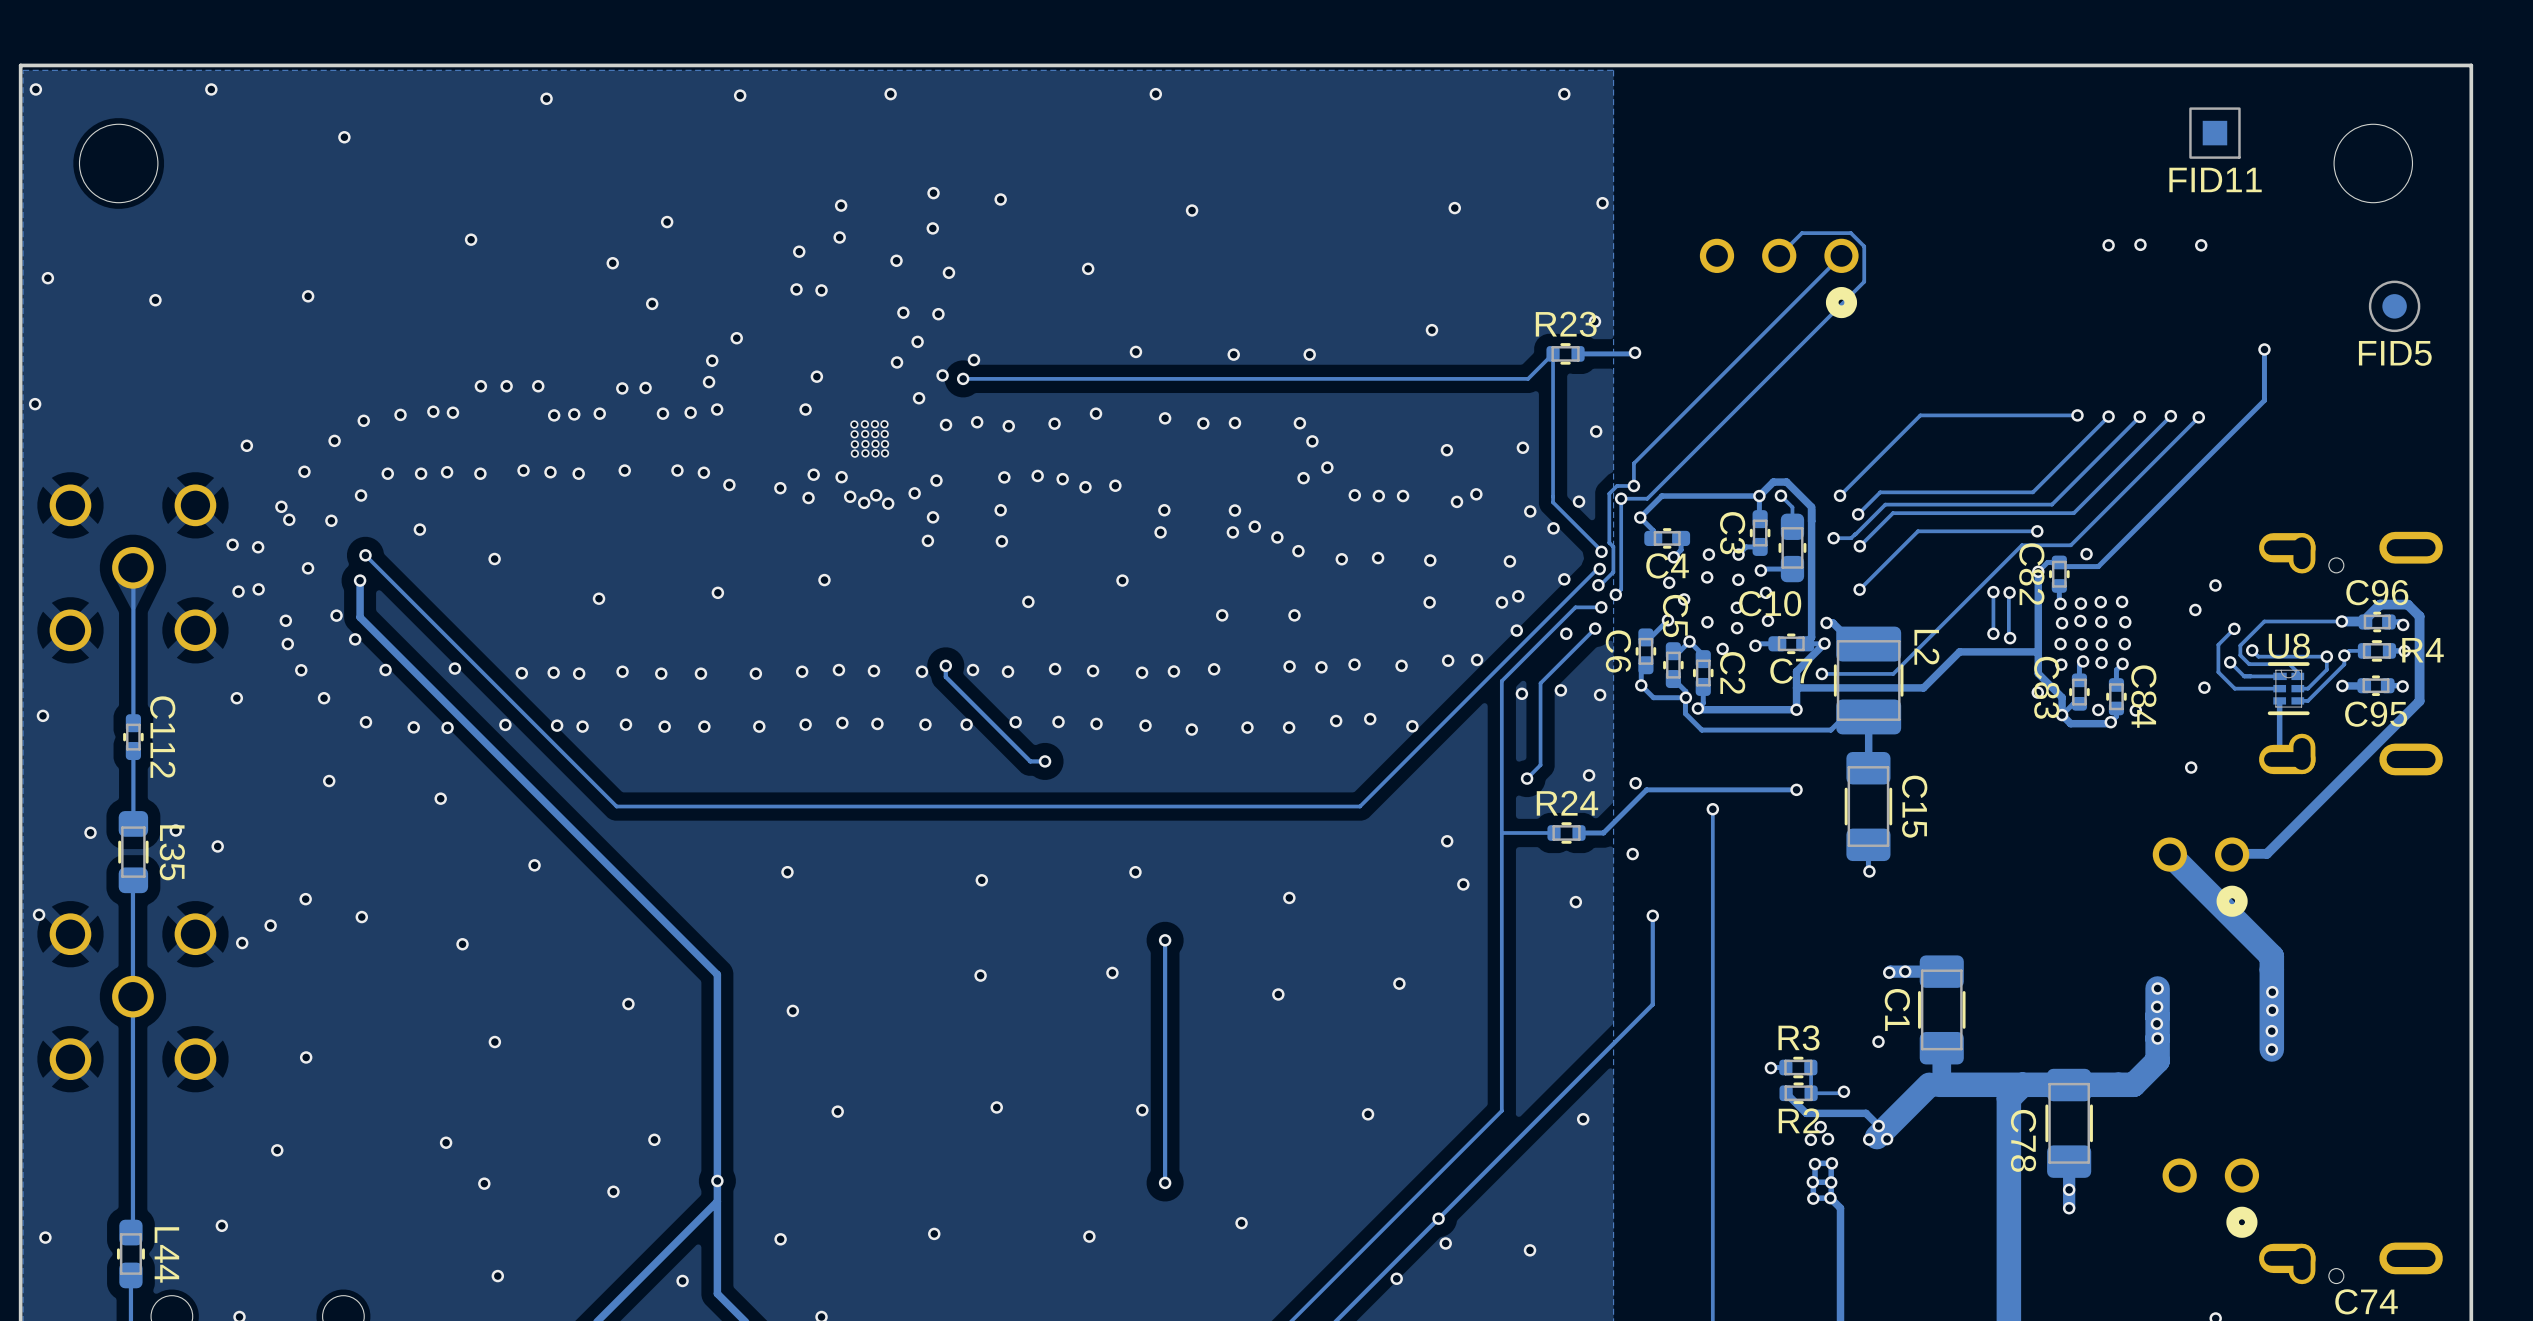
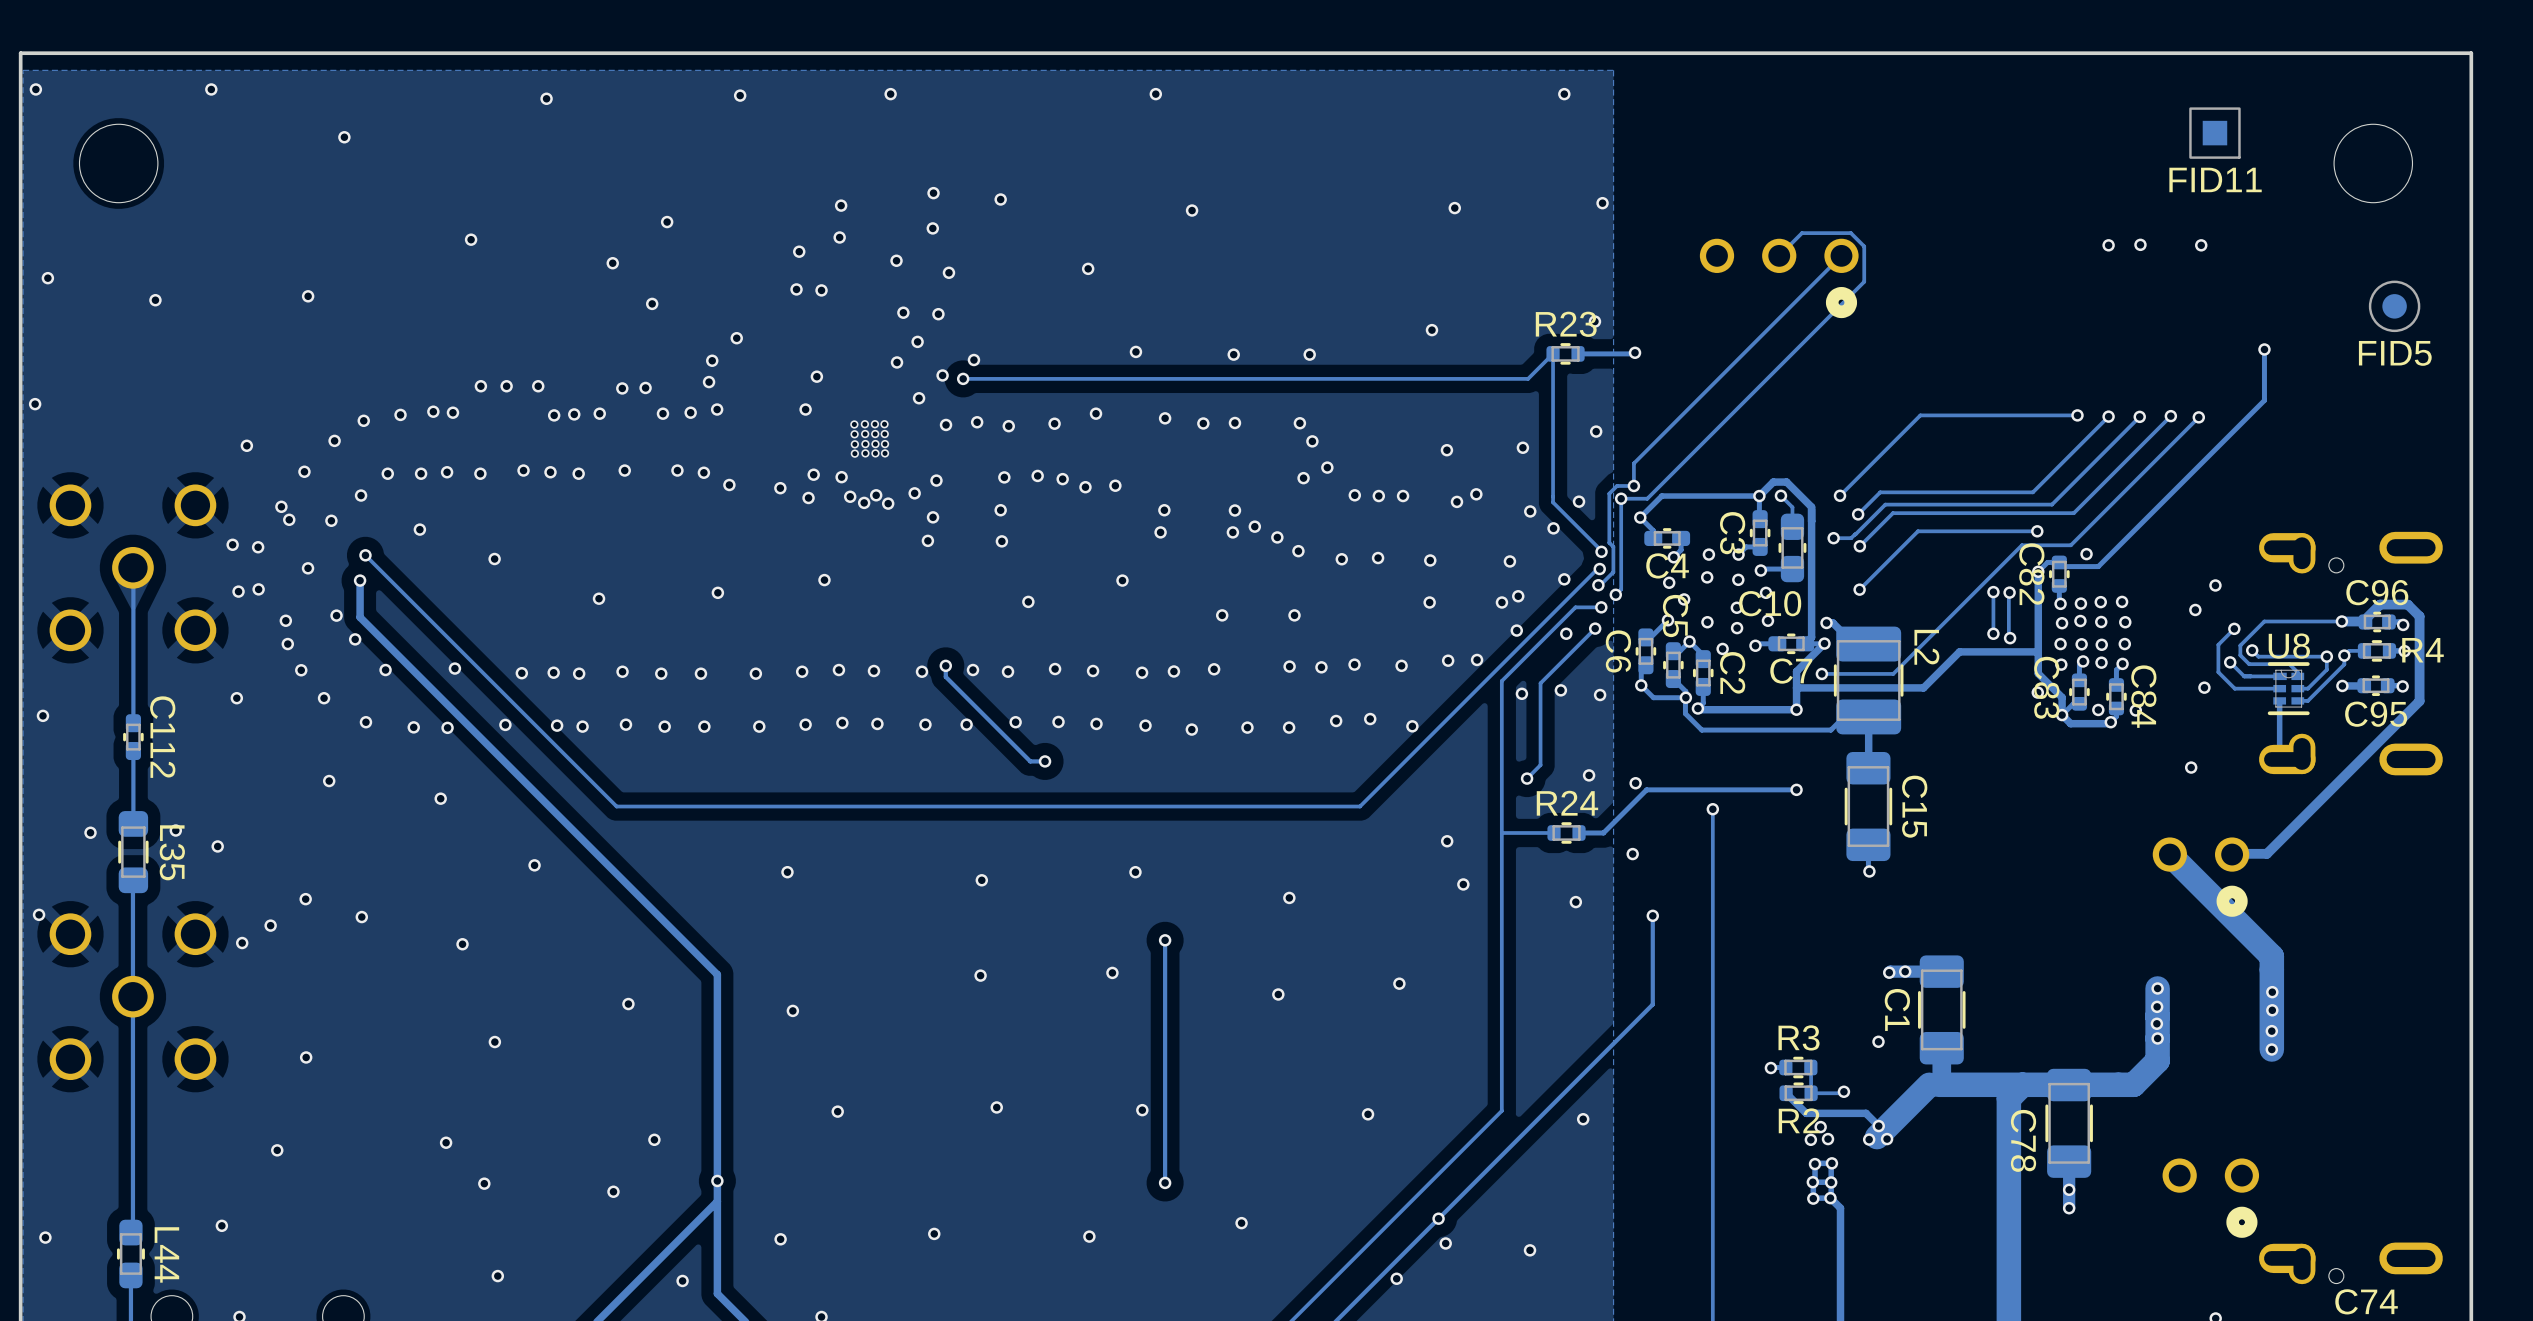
board edge: (2471, 65) (20, 65) -> (2471, 65) (2471, 53) (20, 53) (20, 65)

